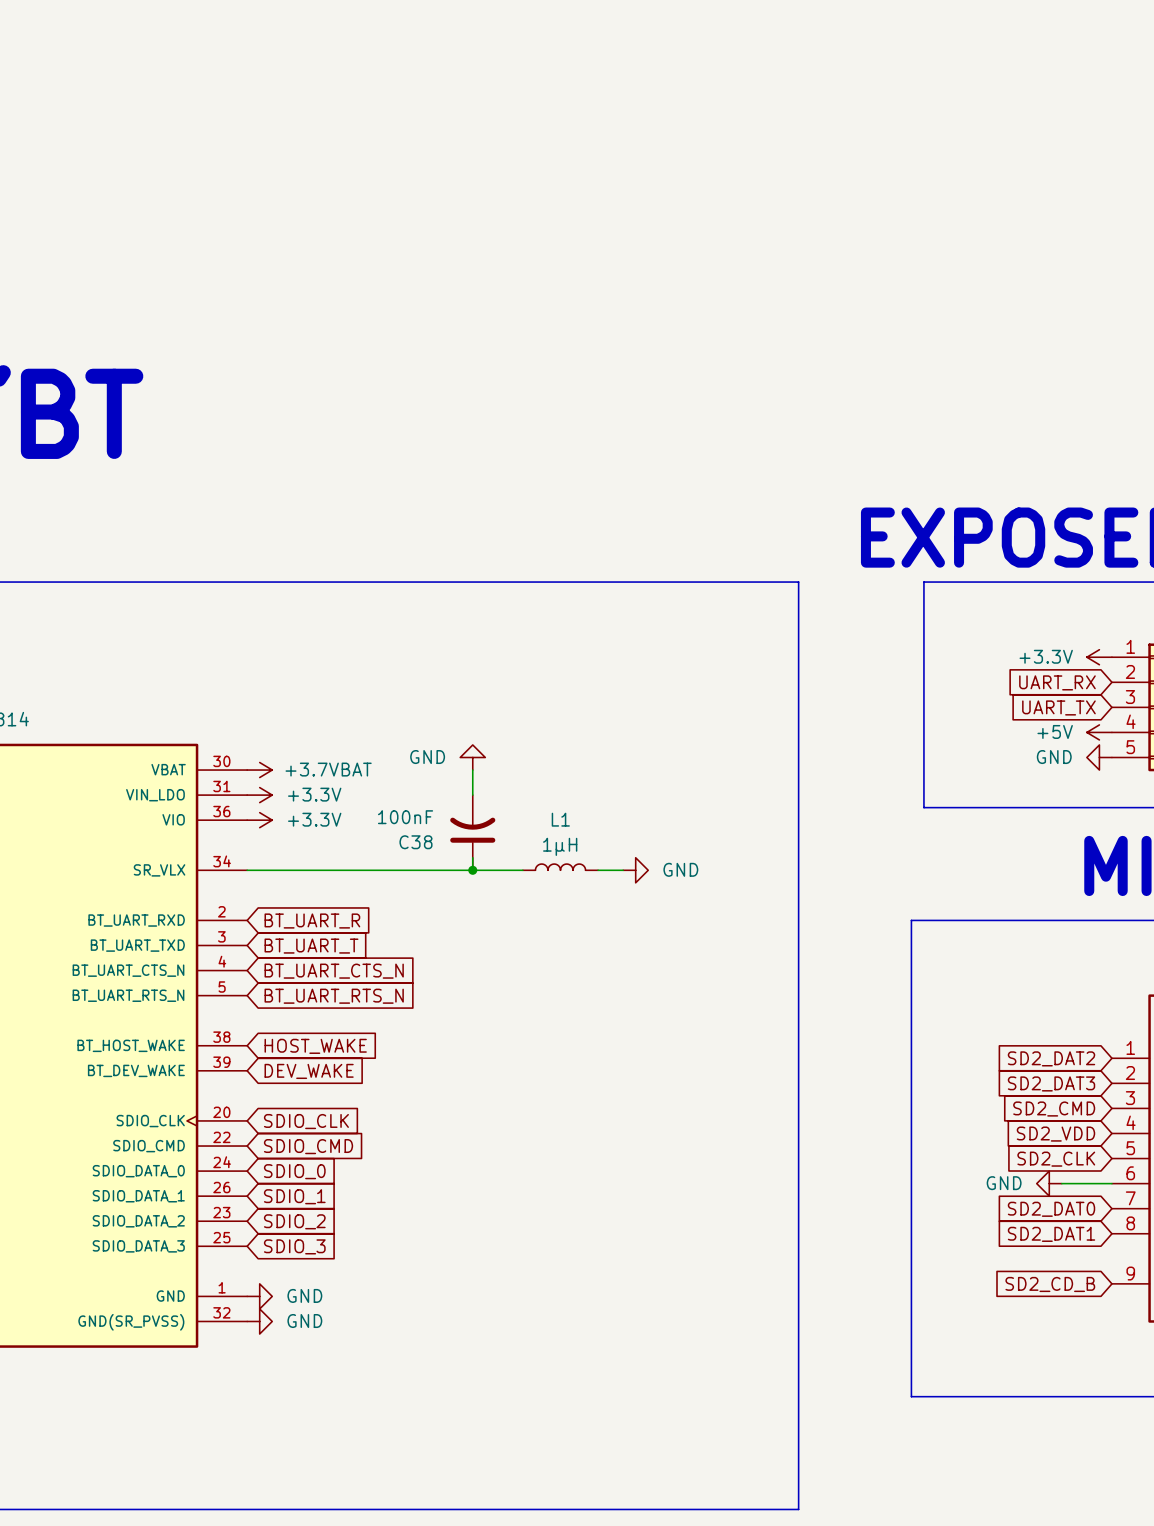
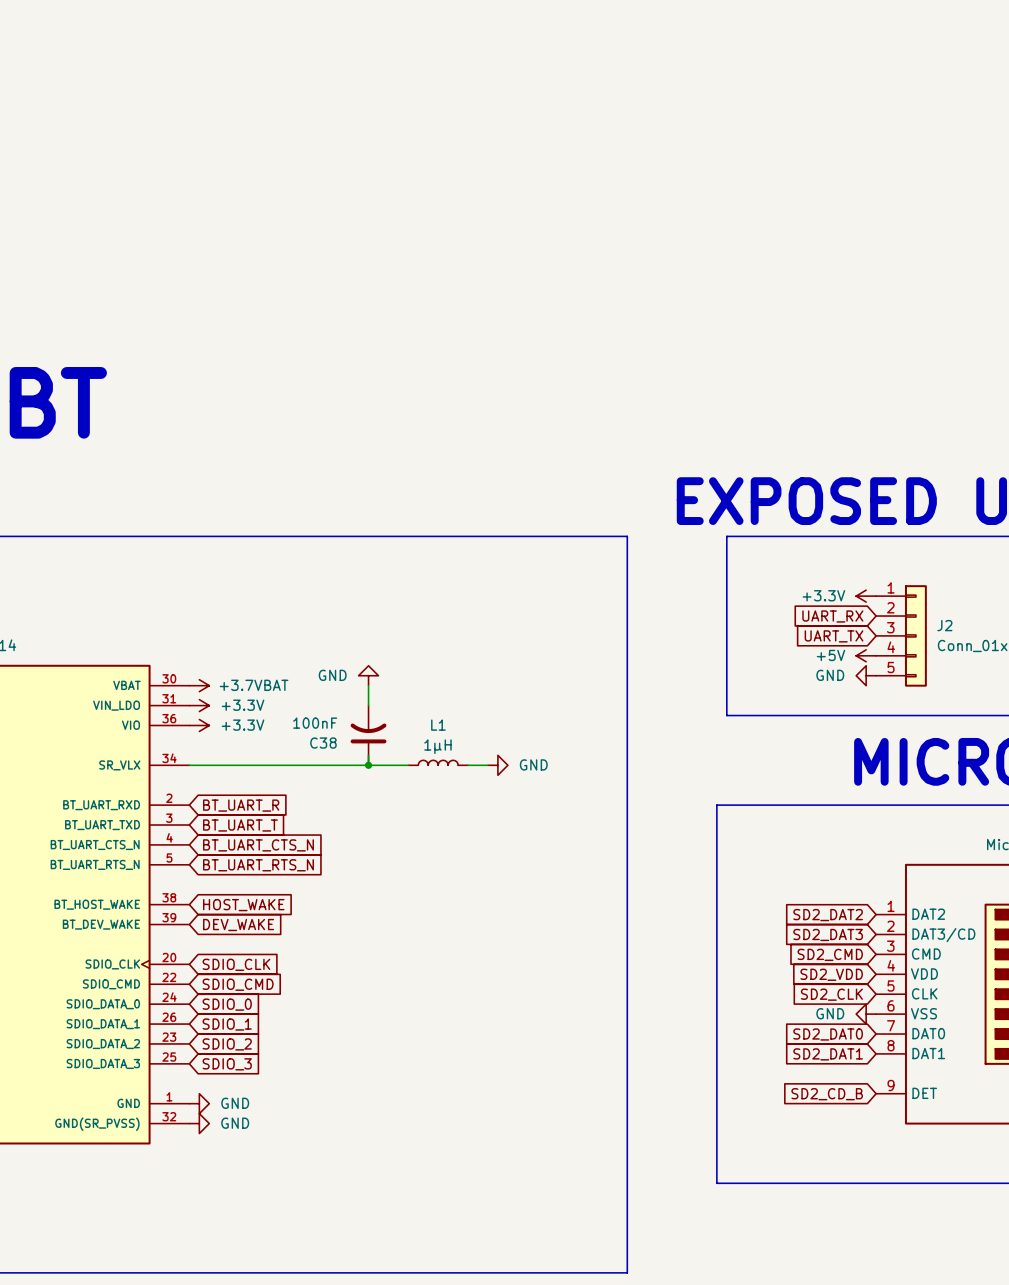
power symbol position: GND (1049, 1183) -> GND (866, 1014)
wire: (1061, 1183) (1111, 1183) -> none

